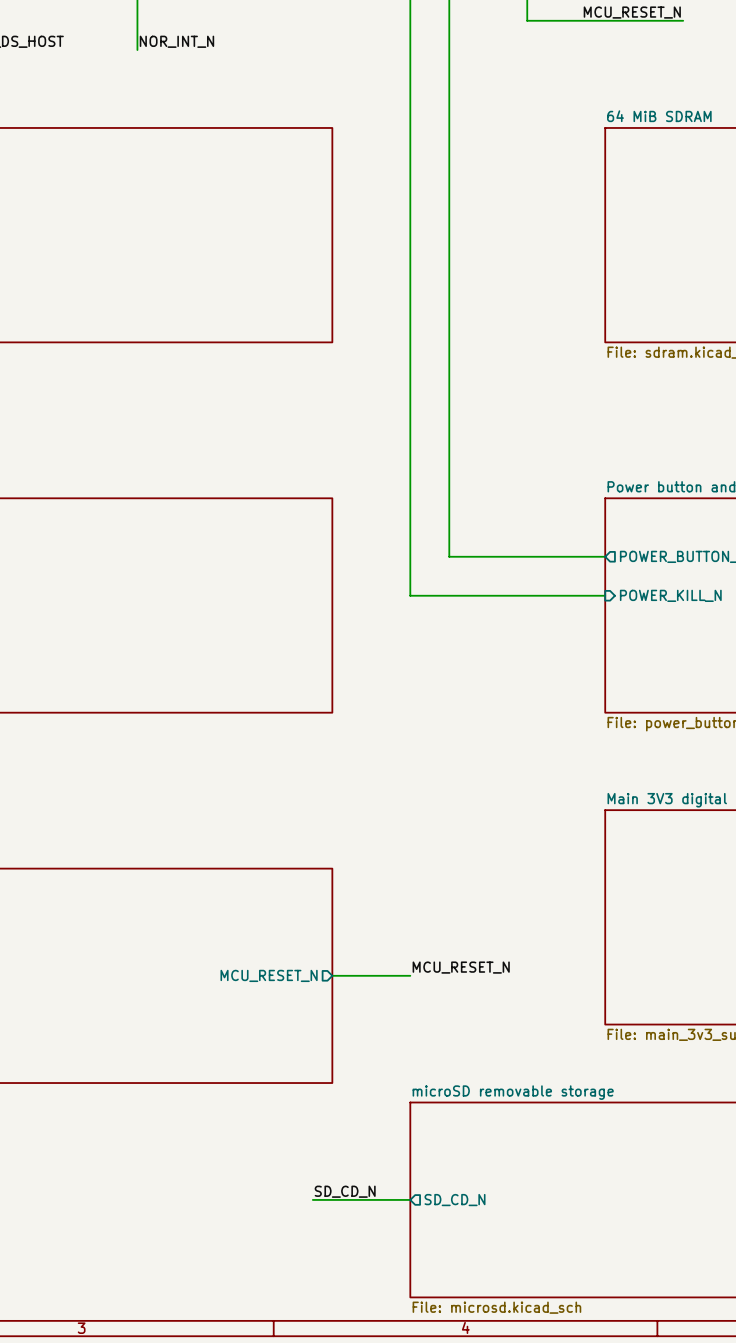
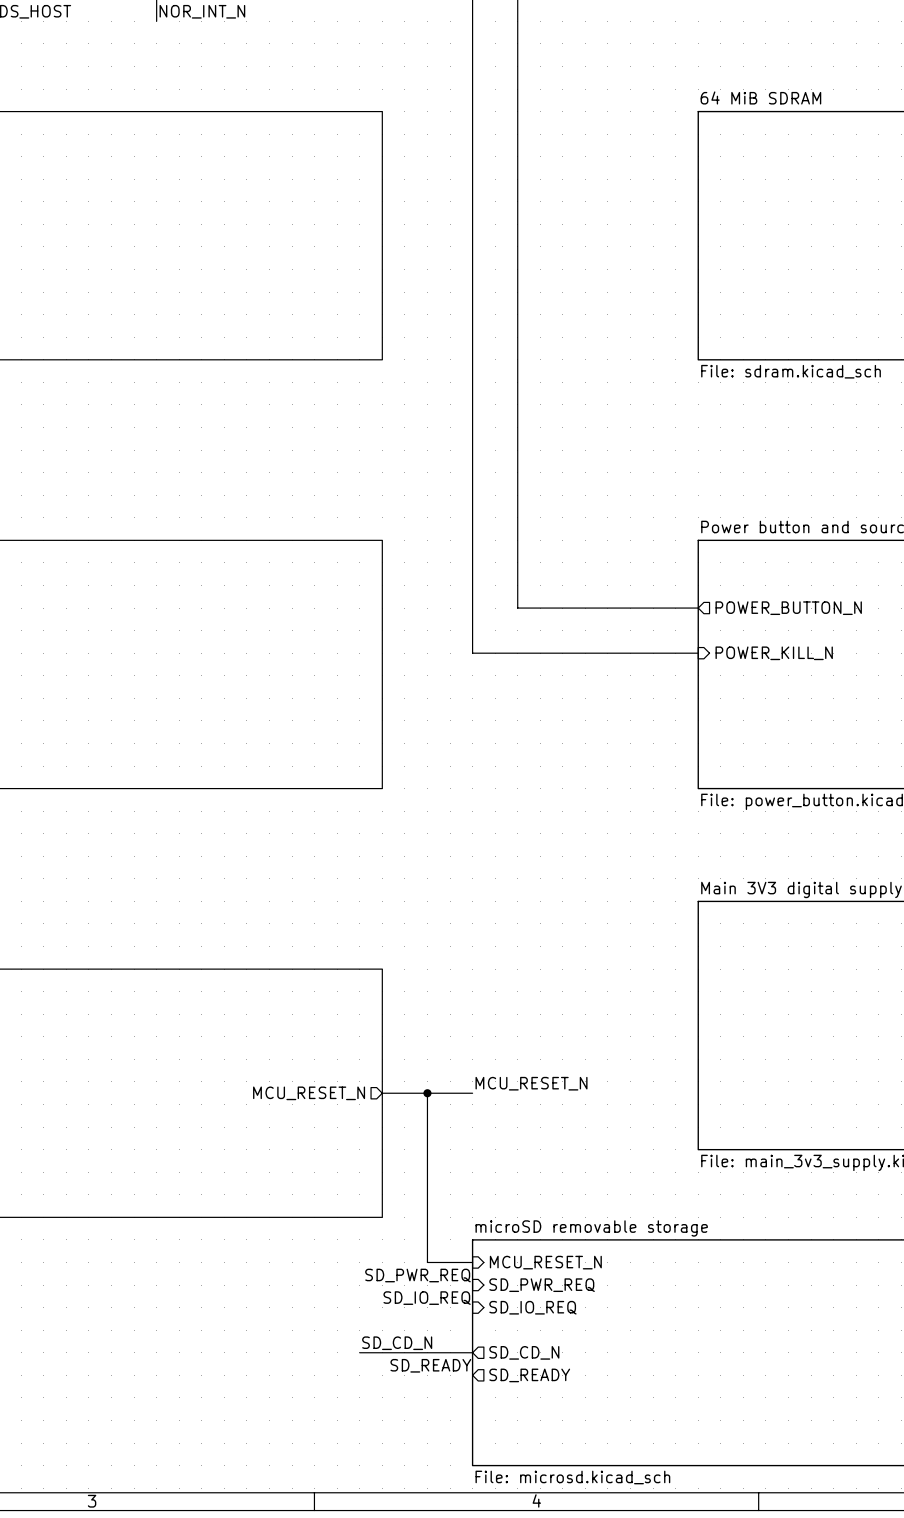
wire: none -> (427, 1093) (427, 1262) (472, 1262)
junction: none -> (427, 1093)
sheet pin: none -> MCU_RESET_N (545, 1262)
label: none -> SD_PWR_REQ (417, 1275)
sheet pin: none -> SD_PWR_REQ (542, 1285)
label: none -> SD_IO_REQ (427, 1298)
sheet pin: none -> SD_IO_REQ (532, 1307)
label: none -> SD_READY (430, 1365)
sheet pin: none -> SD_READY (529, 1375)

